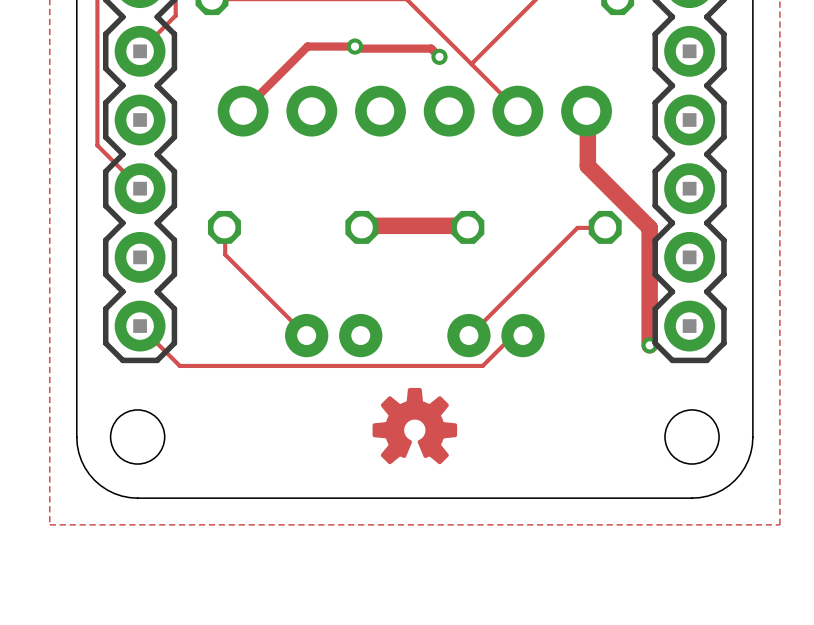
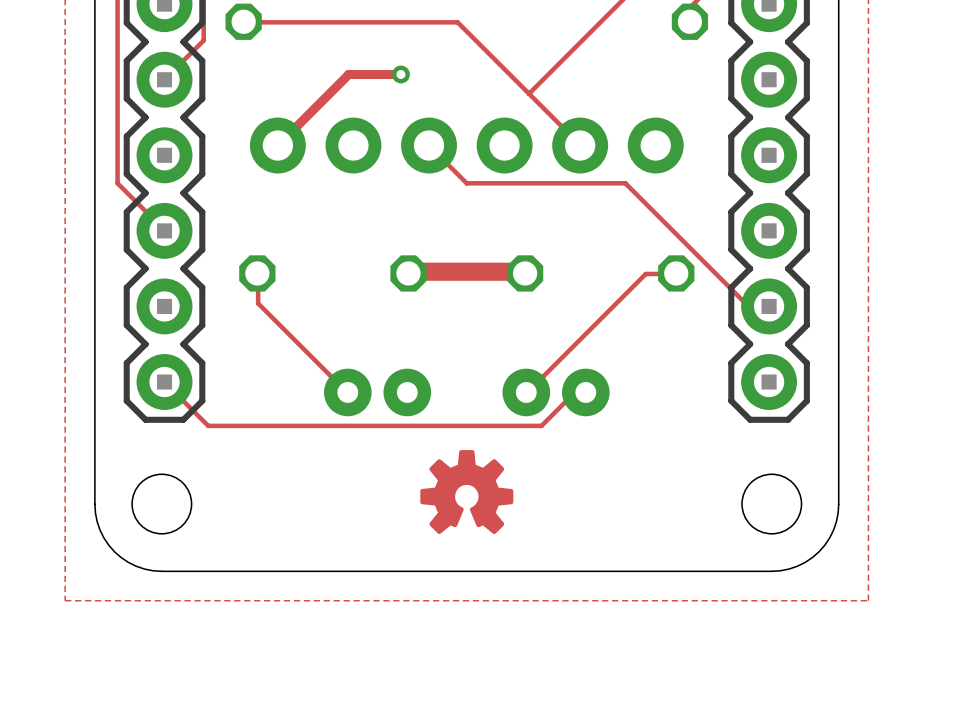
track: (354, 46) (357, 48) (431, 48) (439, 56) -> none
via: (439, 56) -> none
track: none -> (429, 145) (466, 183) (625, 183) (747, 305) (769, 306)
track: (586, 111) (587, 166) (649, 227) (649, 345) -> none
via: (649, 345) -> none

